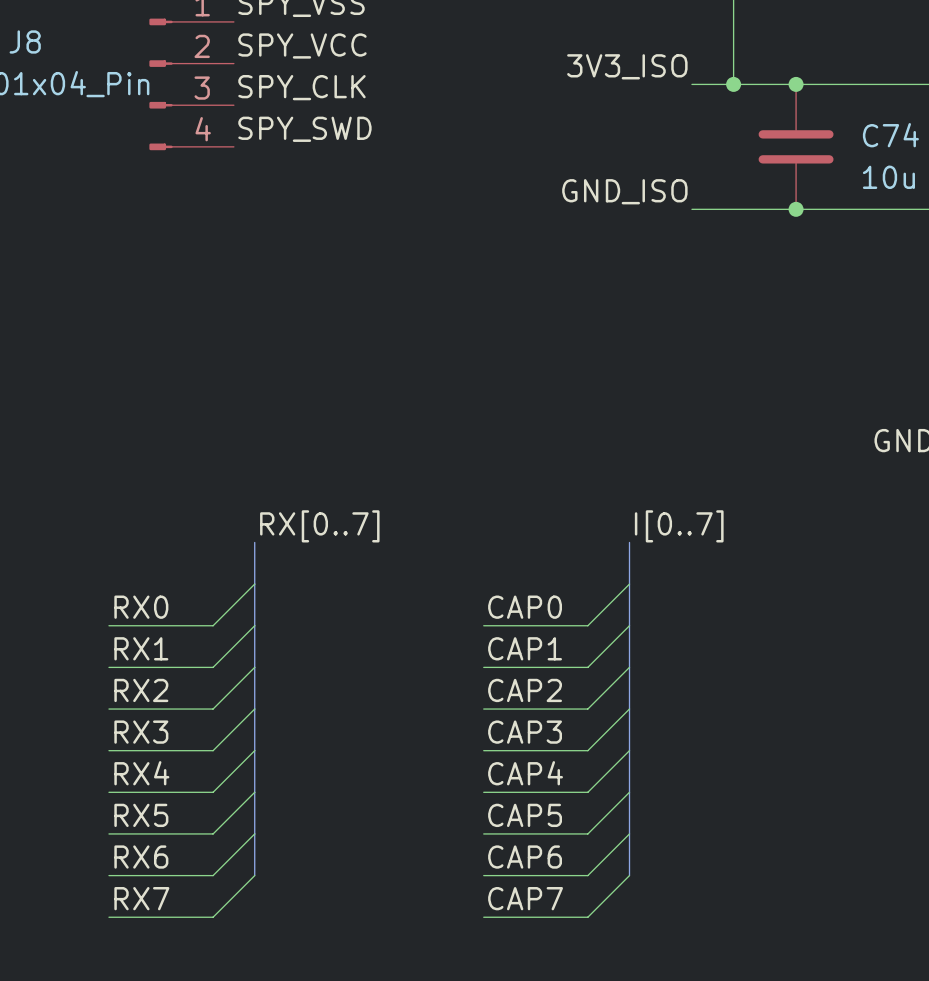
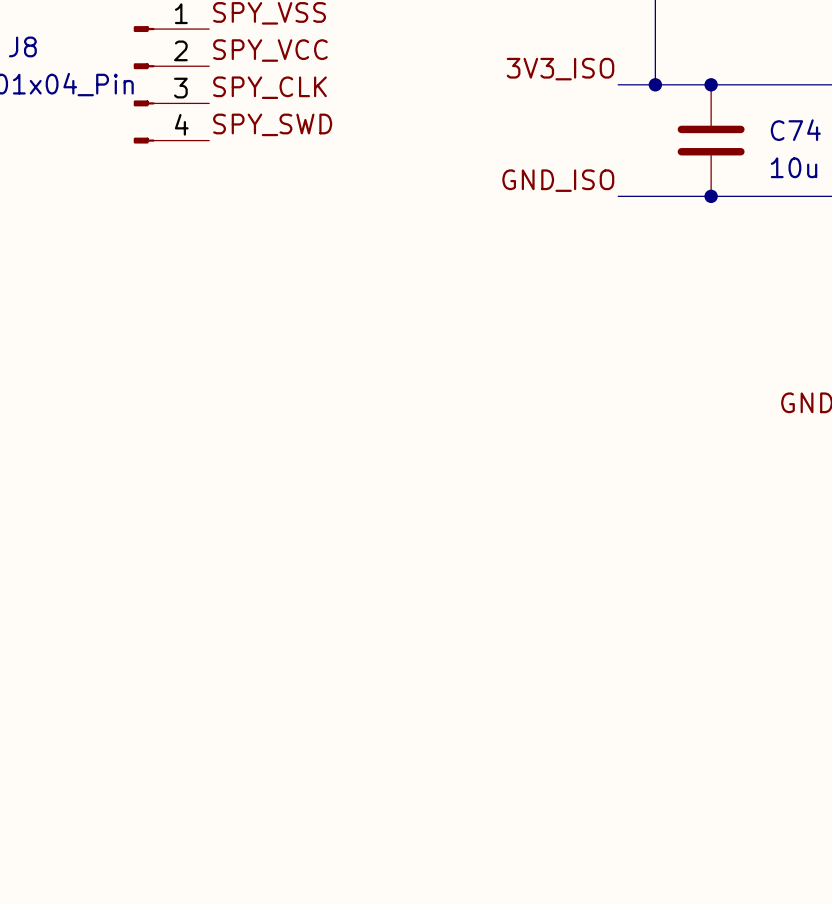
label: RX[0..7] (319, 526) -> none
label: I[0..7] (679, 526) -> none
bus: (254, 542) (254, 875) -> none
bus: (629, 542) (629, 875) -> none
wire: (254, 584) (213, 625) (108, 625) -> none
wire: (629, 584) (587, 625) (483, 625) -> none
label: RX0 (141, 607) -> none
label: CAP0 (525, 607) -> none
wire: (254, 625) (213, 667) (108, 667) -> none
wire: (629, 625) (587, 667) (483, 667) -> none
label: RX1 (141, 648) -> none
label: CAP1 (525, 648) -> none
wire: (254, 667) (213, 709) (108, 709) -> none
wire: (629, 667) (587, 709) (483, 709) -> none
label: RX2 (141, 690) -> none
label: CAP2 (525, 690) -> none
wire: (254, 709) (213, 750) (108, 750) -> none
wire: (629, 709) (587, 750) (483, 750) -> none
label: RX3 (141, 732) -> none
label: CAP3 (525, 732) -> none
wire: (254, 750) (213, 792) (108, 792) -> none
wire: (629, 750) (587, 792) (483, 792) -> none
label: RX4 (141, 773) -> none
label: CAP4 (525, 773) -> none
wire: (254, 792) (213, 833) (108, 833) -> none
wire: (629, 792) (587, 833) (483, 833) -> none
label: RX5 (141, 815) -> none
label: CAP5 (525, 815) -> none
wire: (254, 833) (213, 875) (108, 875) -> none
wire: (629, 833) (587, 875) (483, 875) -> none
label: RX6 (141, 857) -> none
label: CAP6 (525, 857) -> none
wire: (254, 875) (213, 917) (108, 917) -> none
wire: (629, 875) (587, 917) (483, 917) -> none
label: RX7 (141, 898) -> none
label: CAP7 (525, 898) -> none

